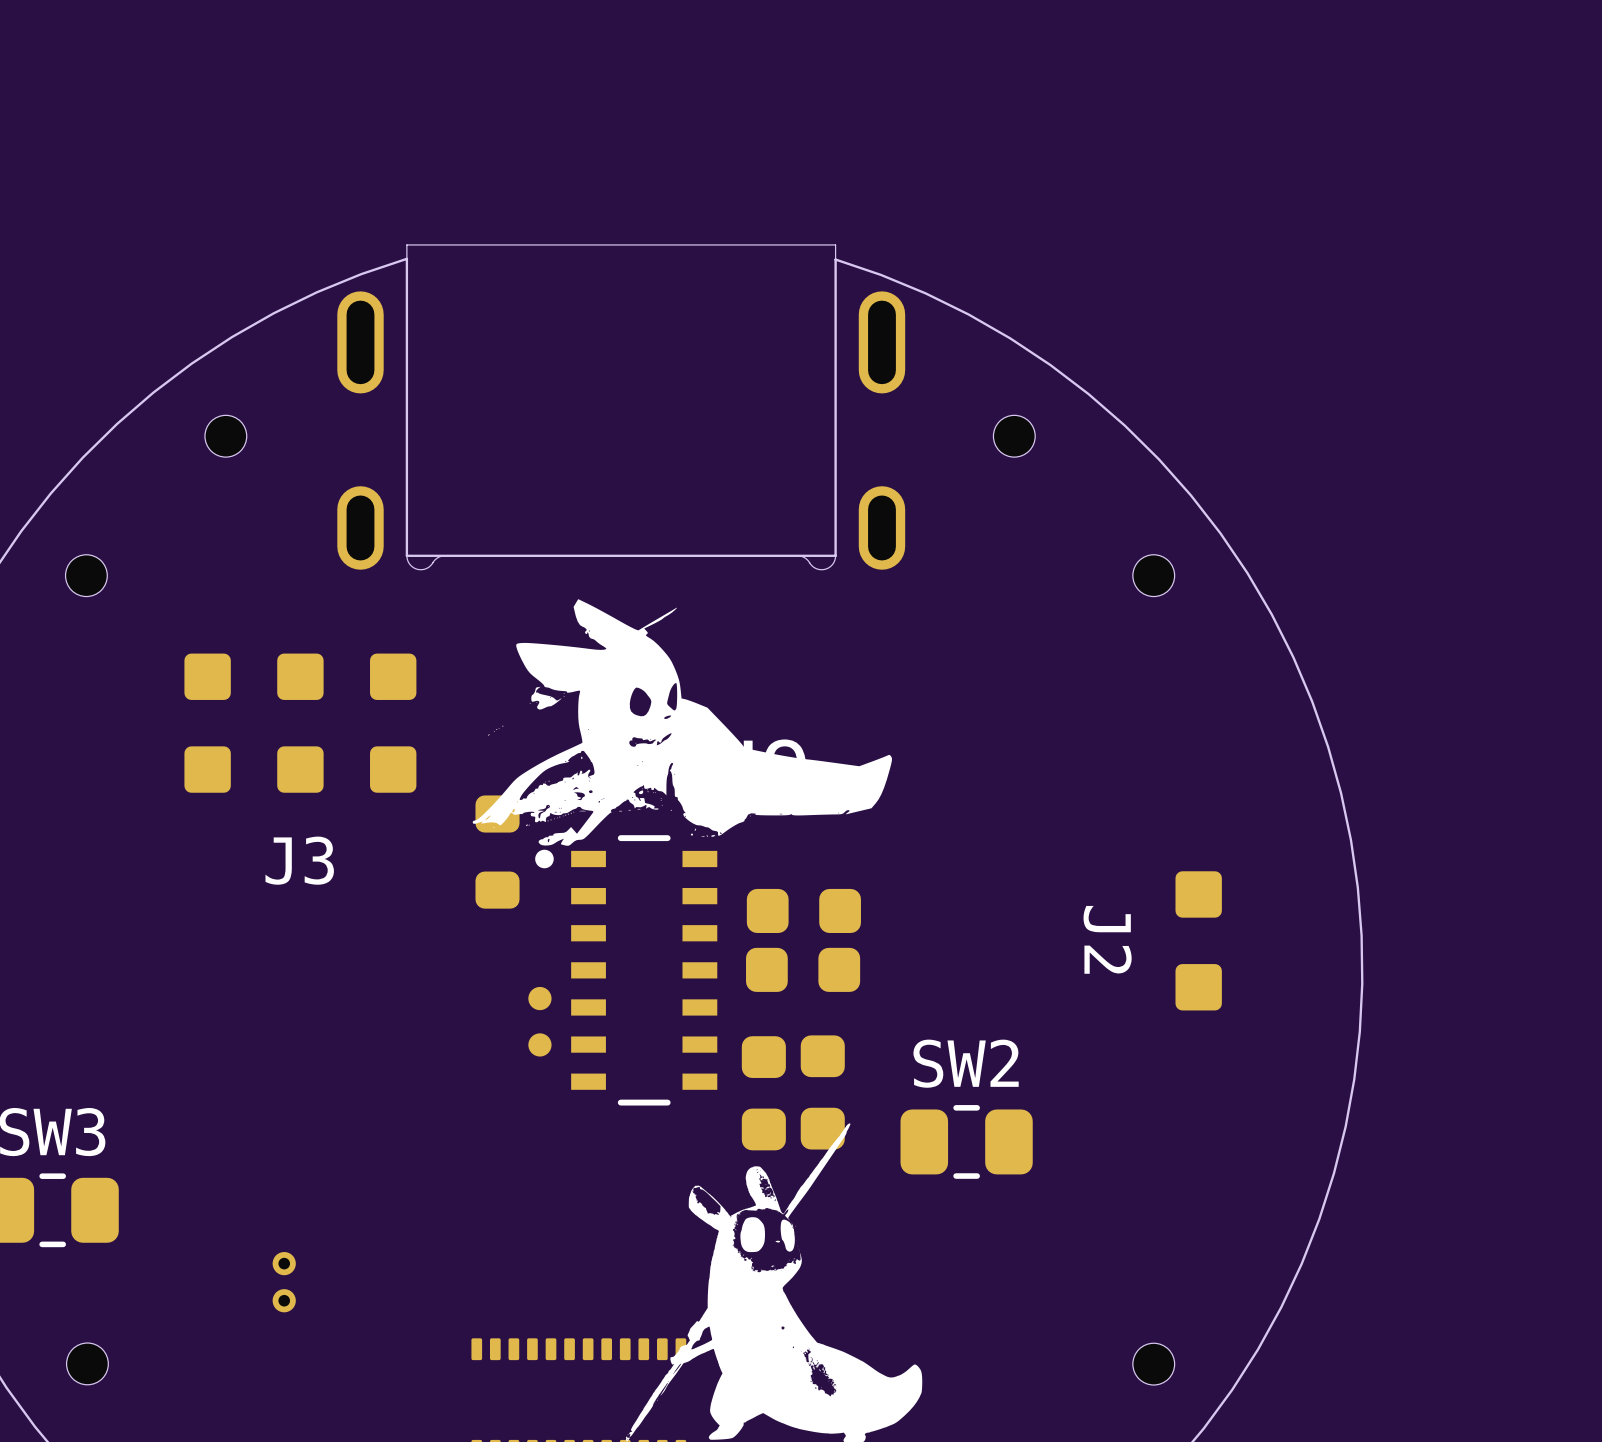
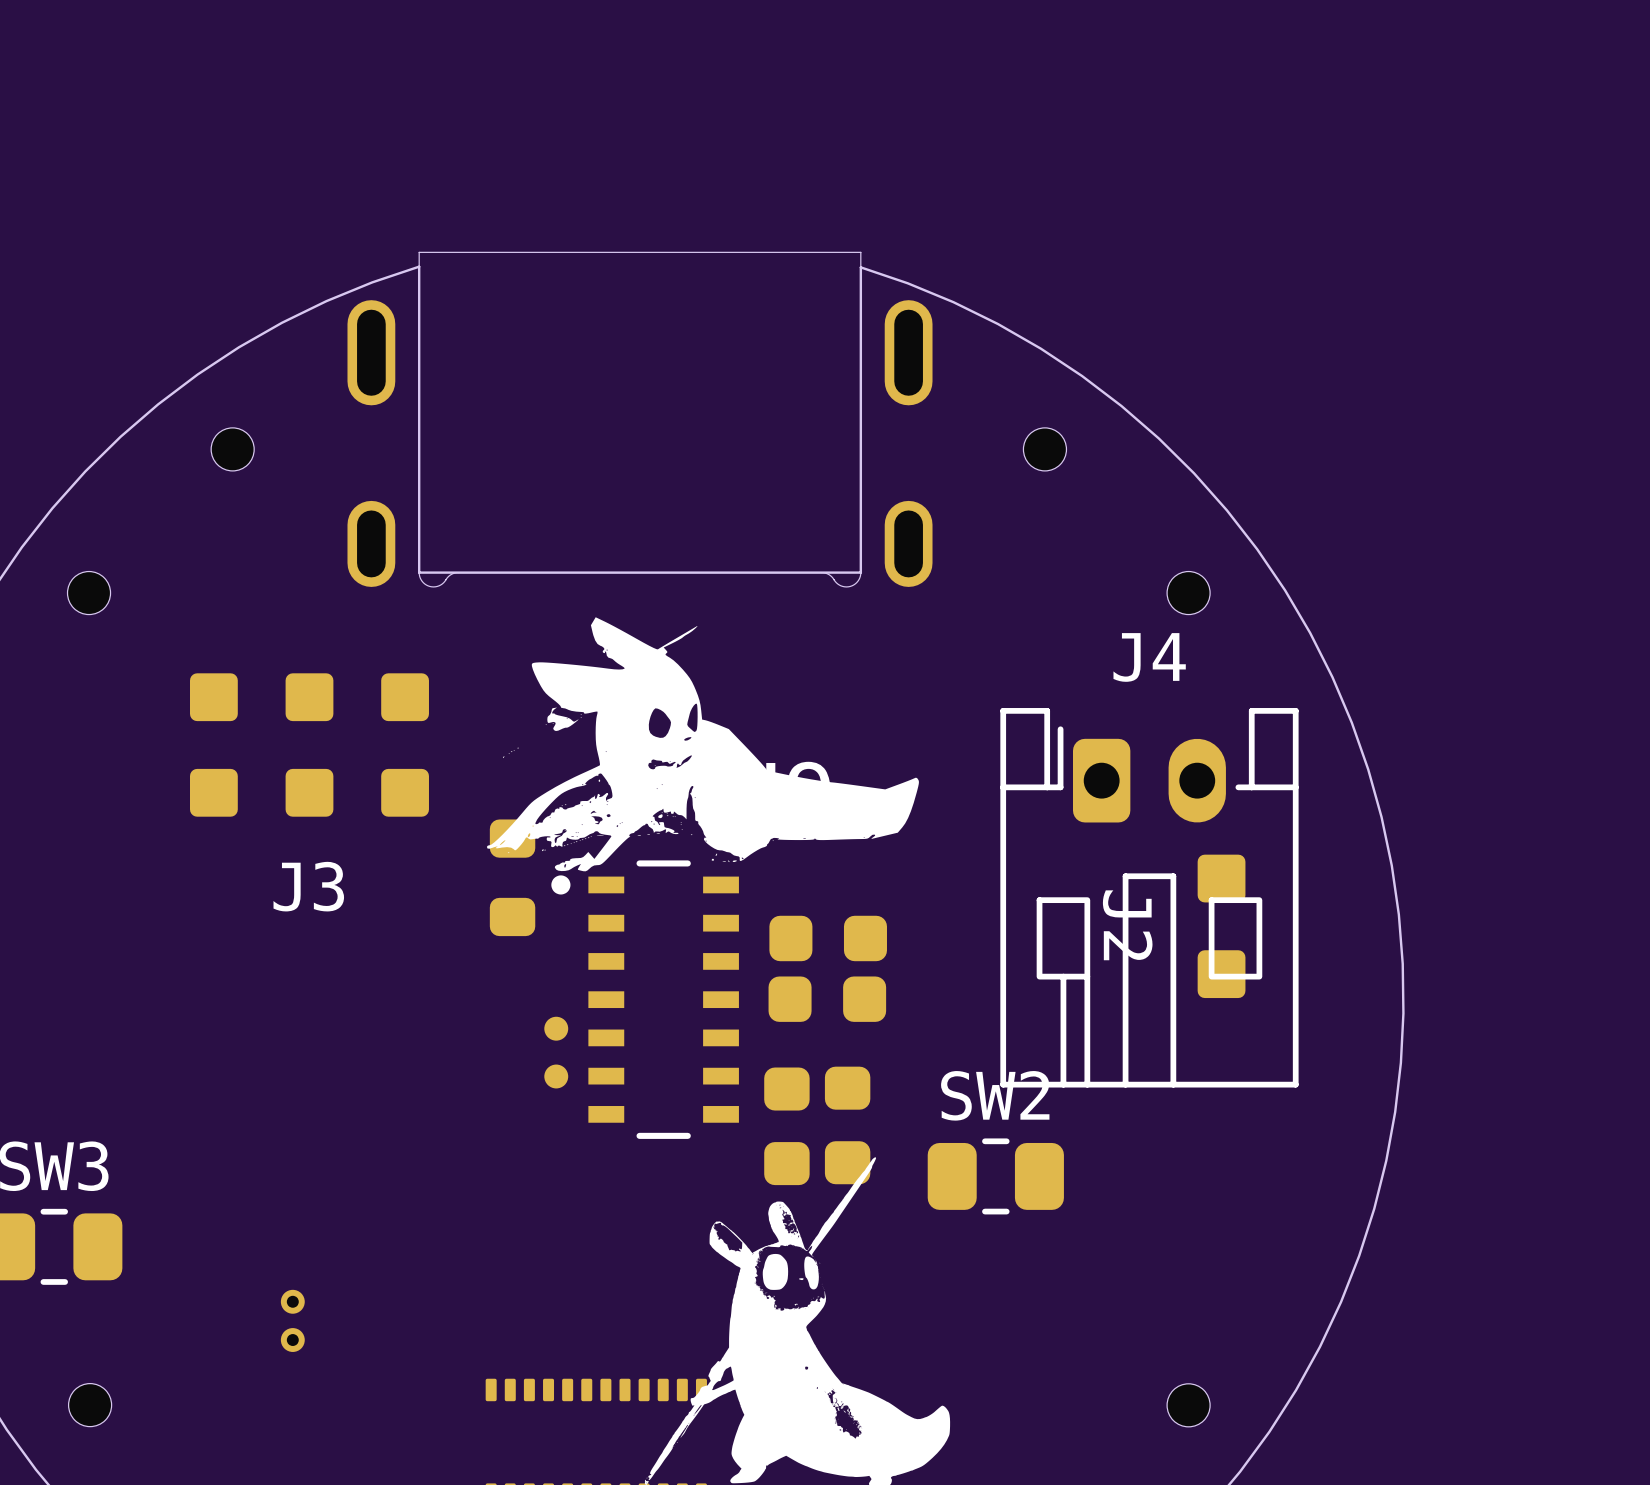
J4: none -> (1149, 897)
J2 position: (1198, 940) -> (1221, 926)

